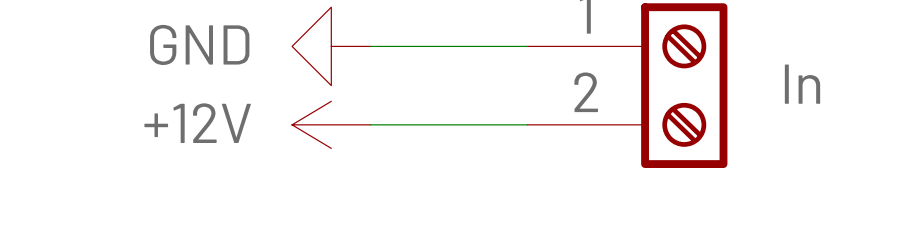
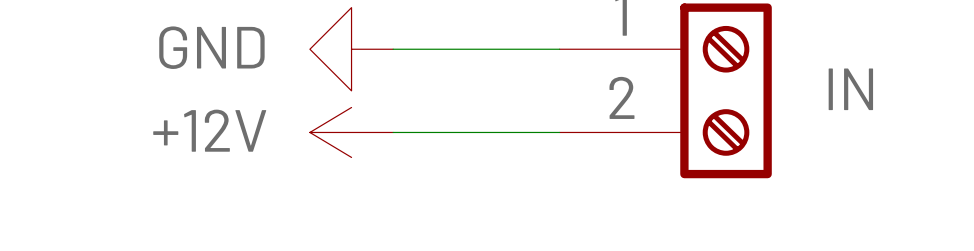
part value: In (802, 84) -> IN (850, 89)

